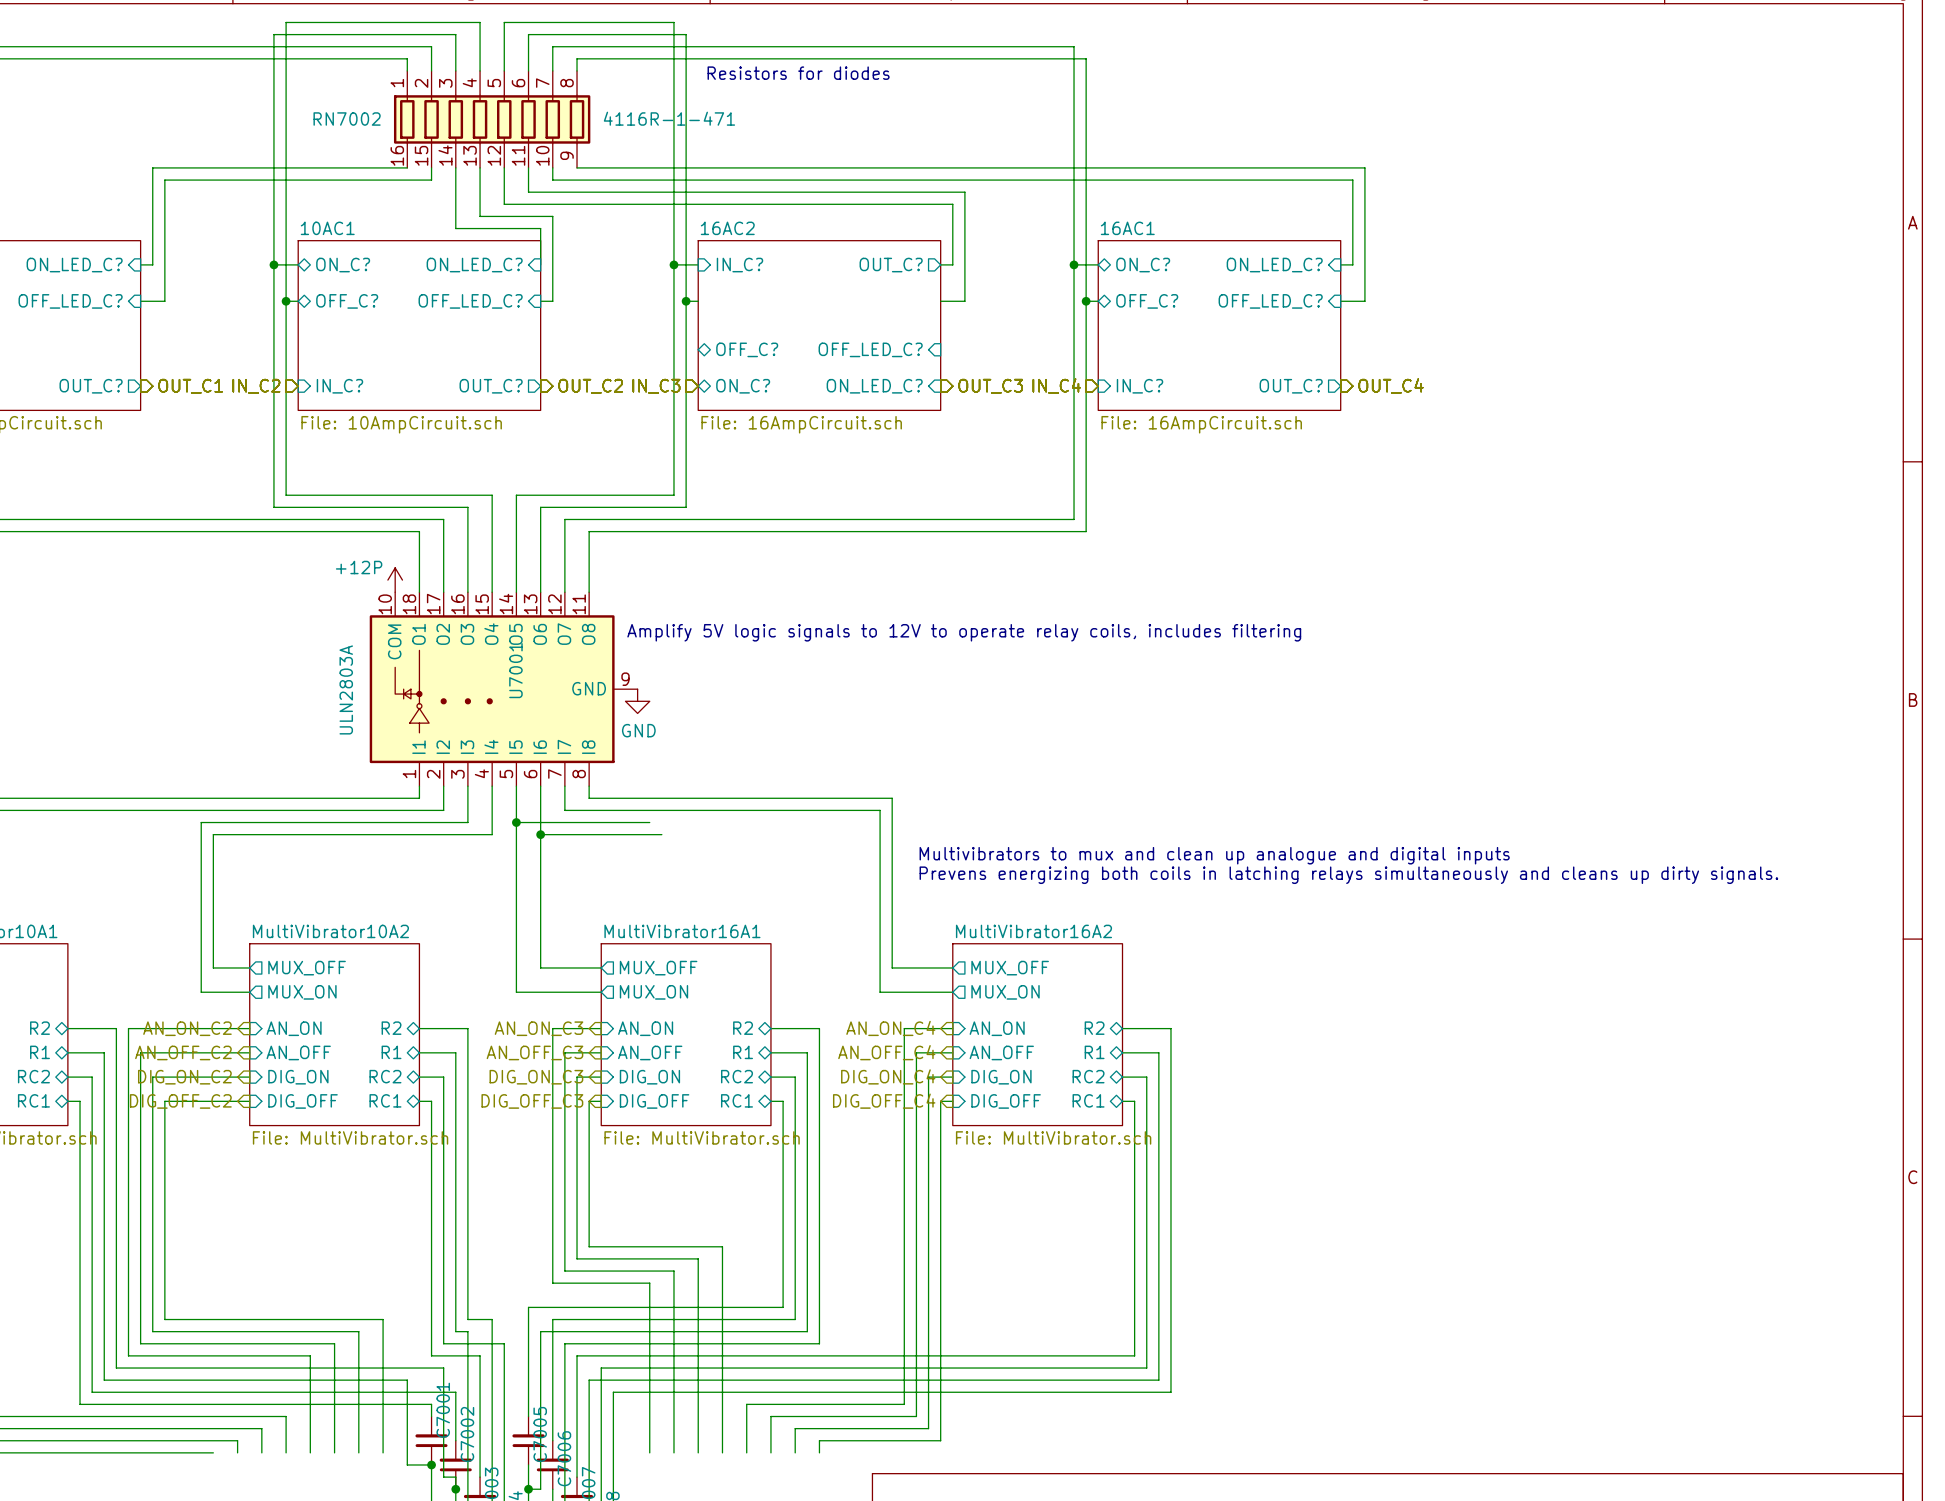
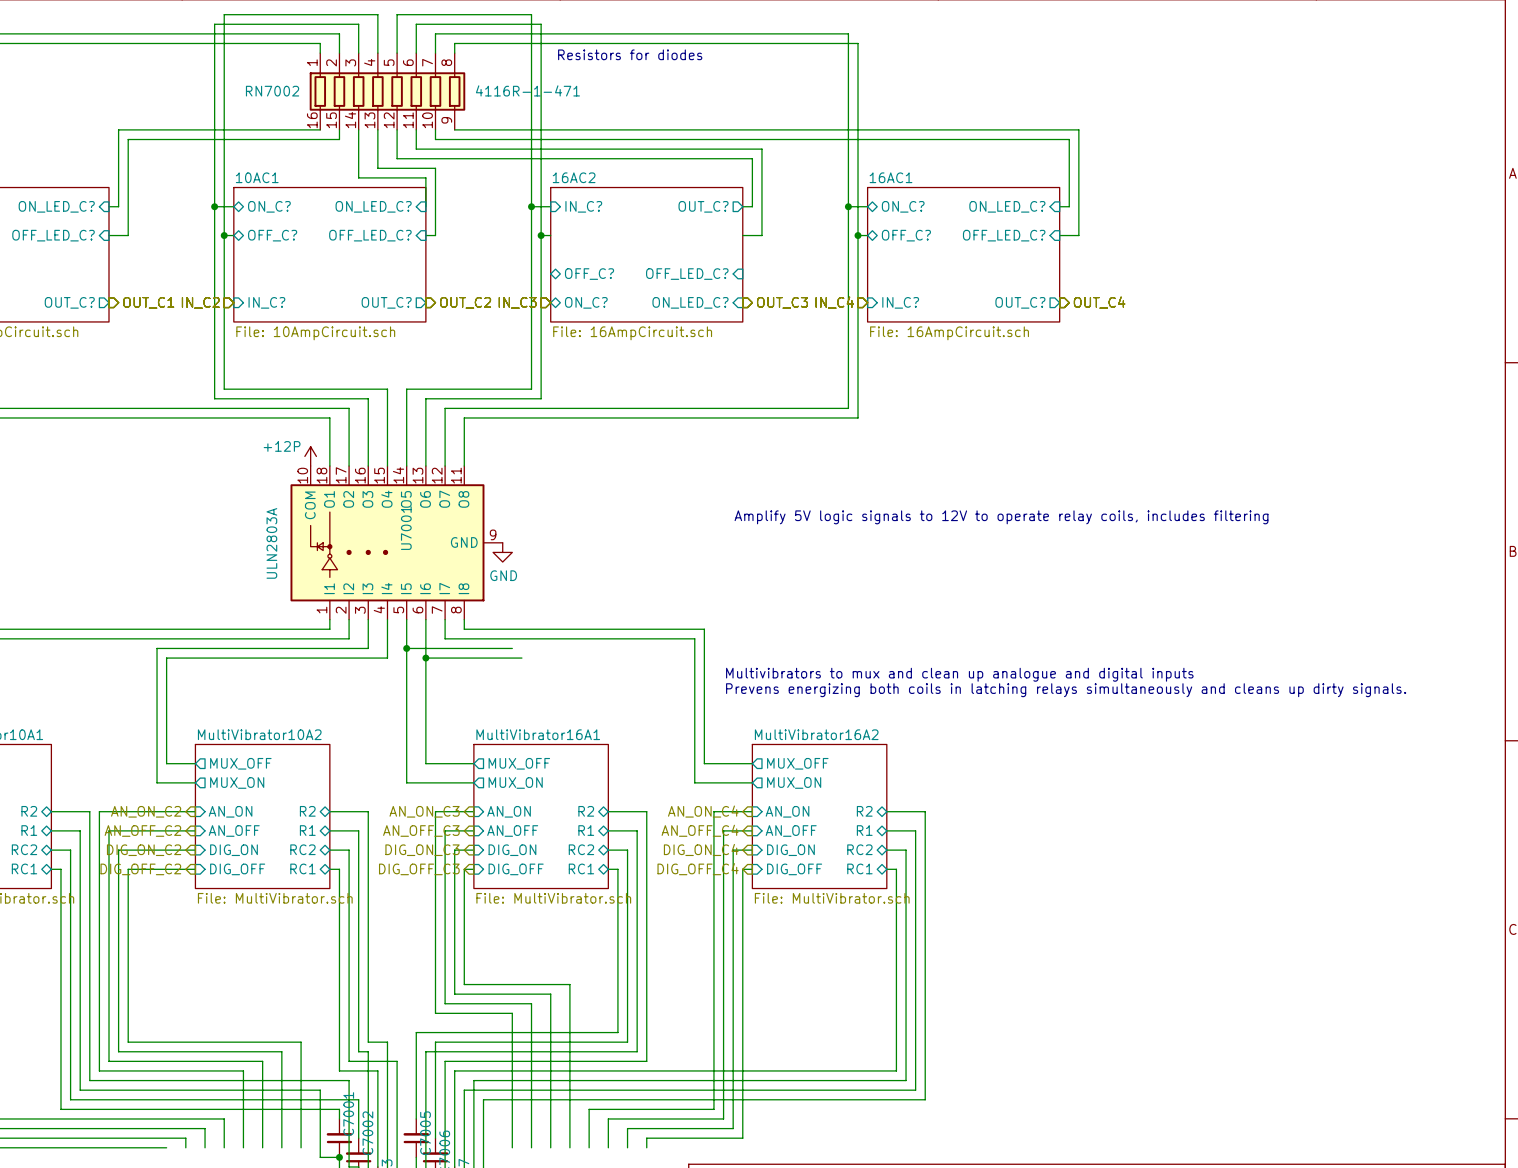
text: Amplify 5V logic signals to 12V to operate relay coils, includes filtering (964, 632) -> none
text: none -> Amplify 5V logic signals to 12V to operate relay coils, includes filtering (1001, 517)

